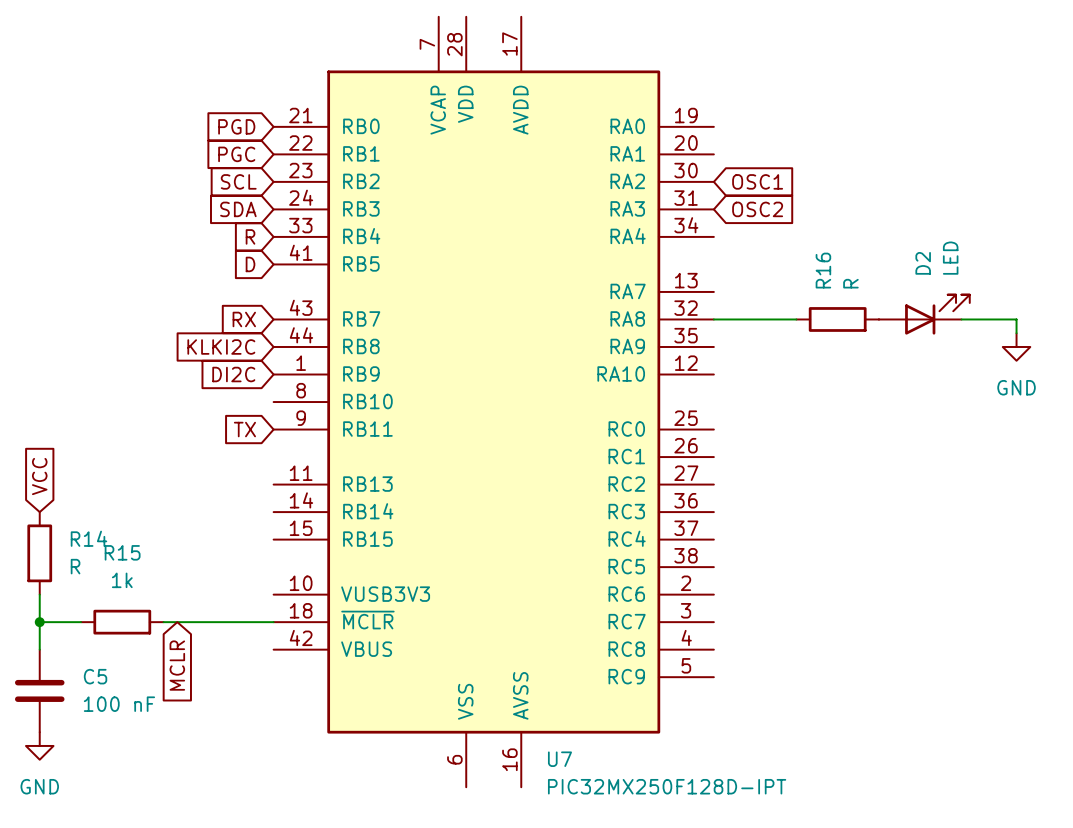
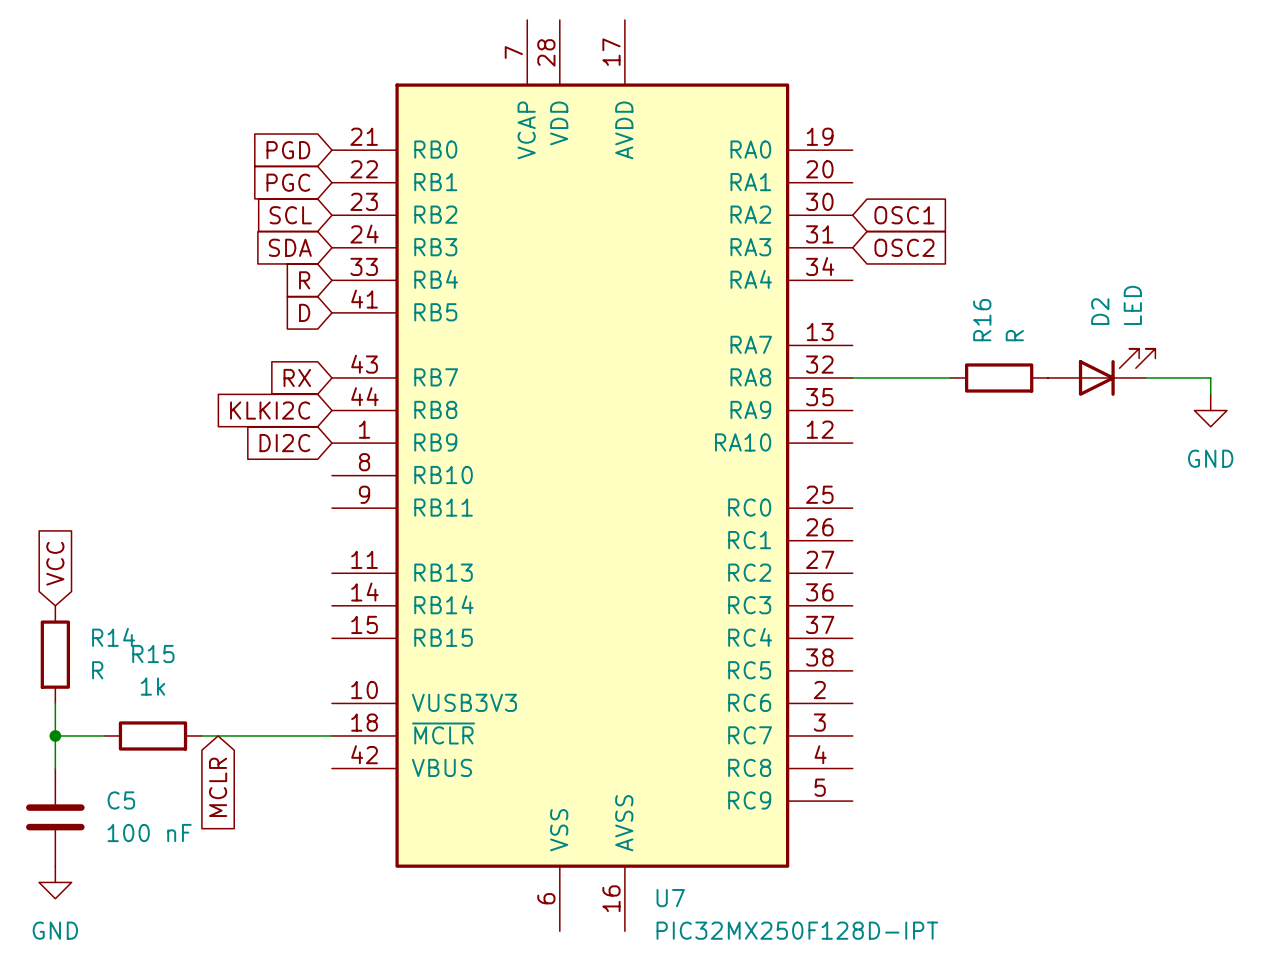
global label: TX (244, 429) -> none

